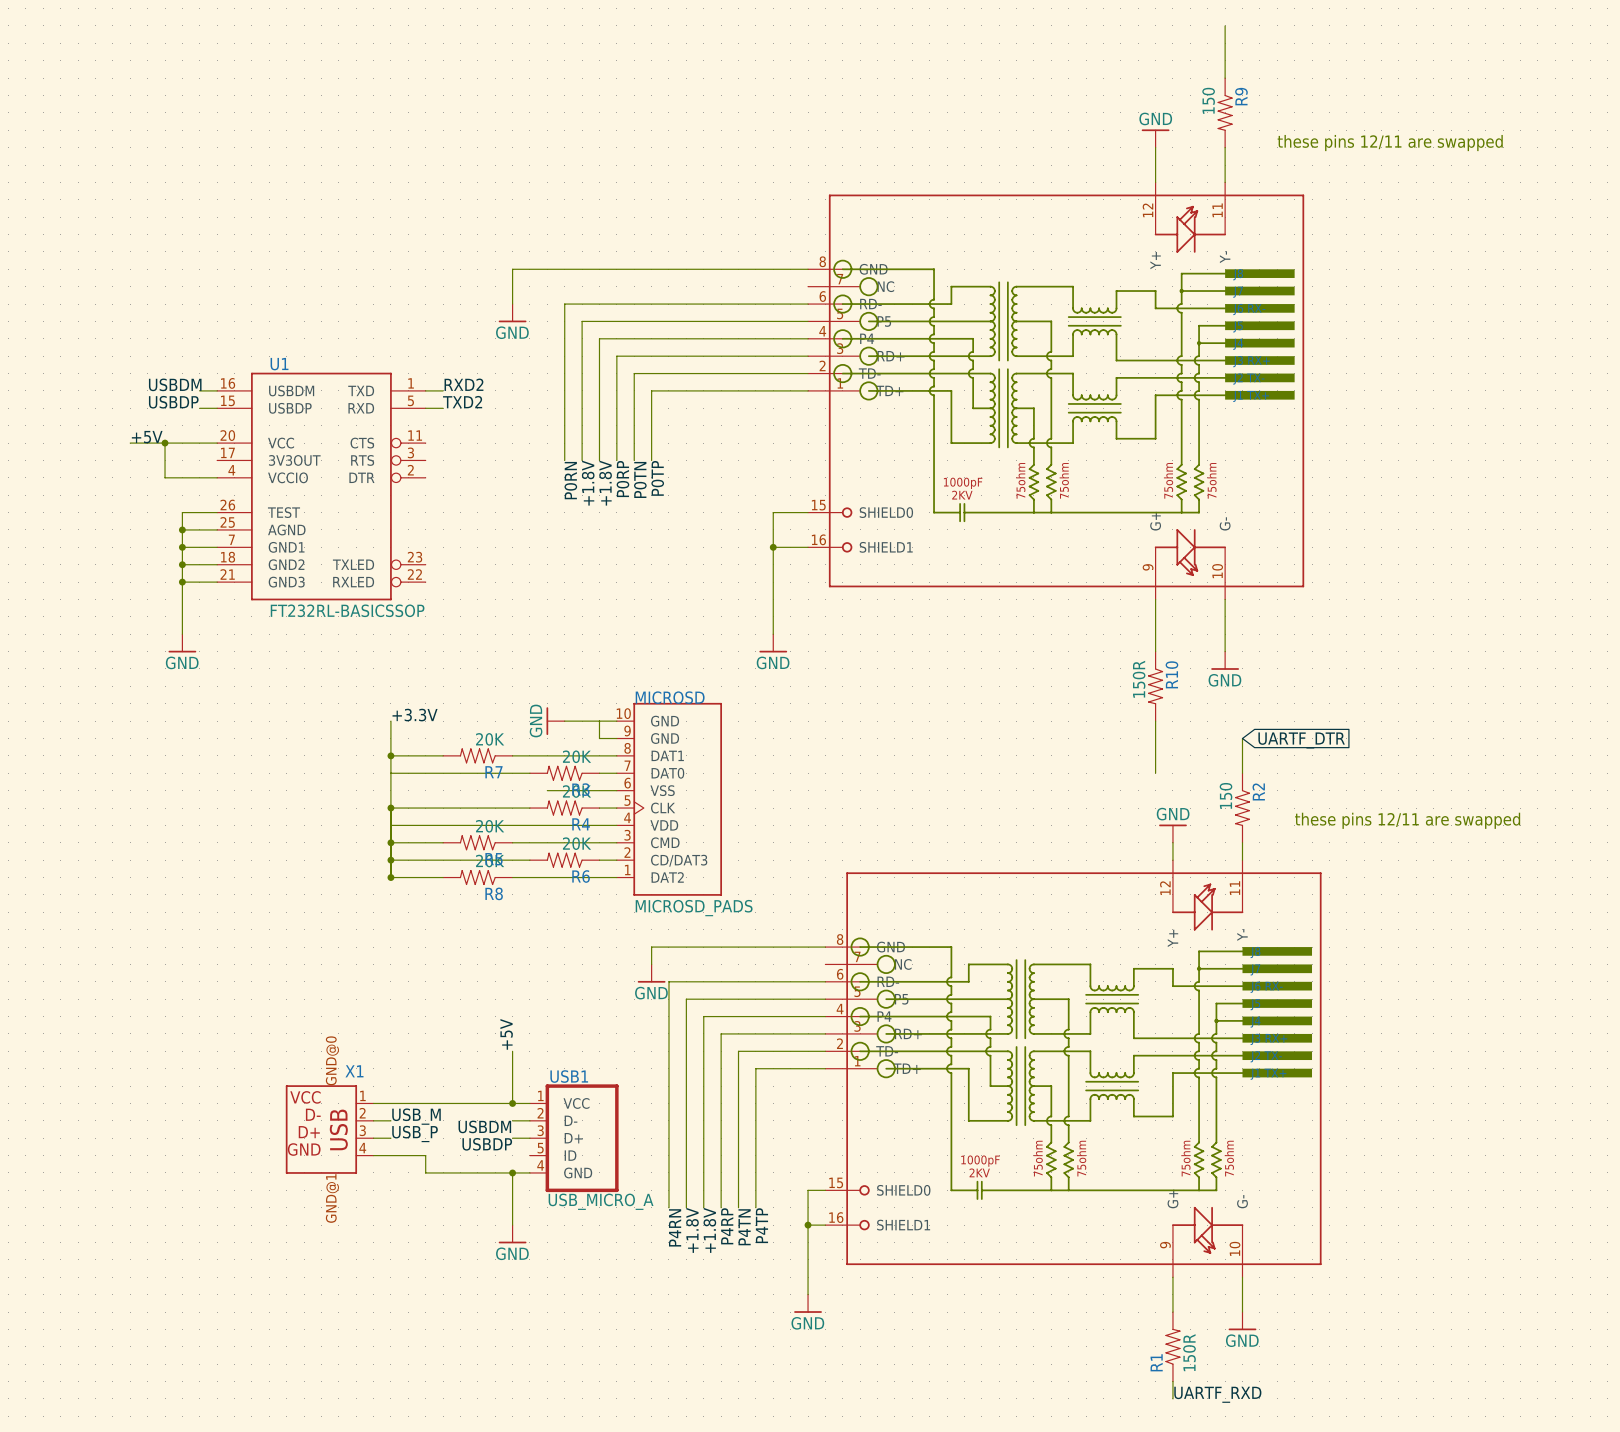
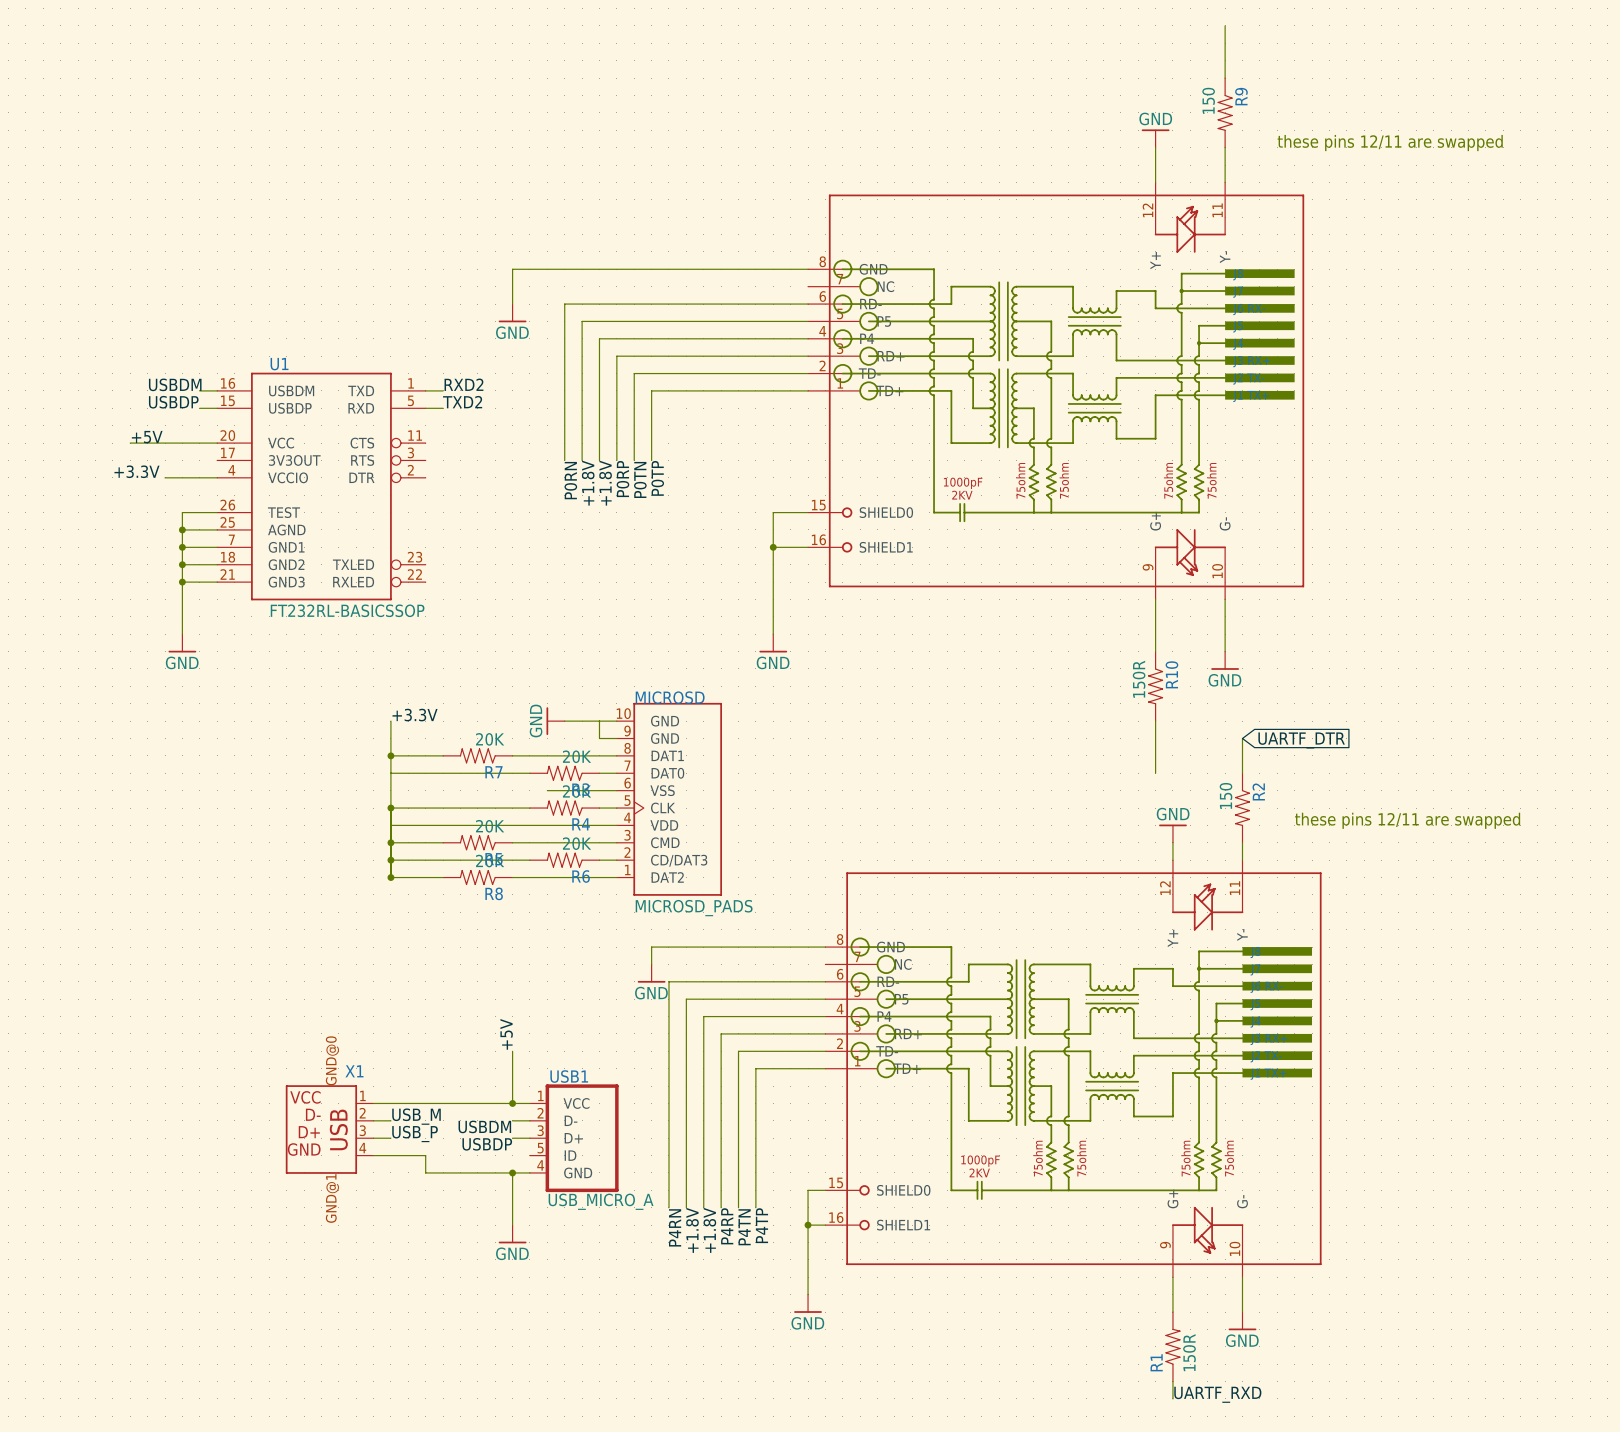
wire: (165, 443) (165, 477) -> none
junction: (165, 443) -> none
label: none -> +3.3V (136, 471)

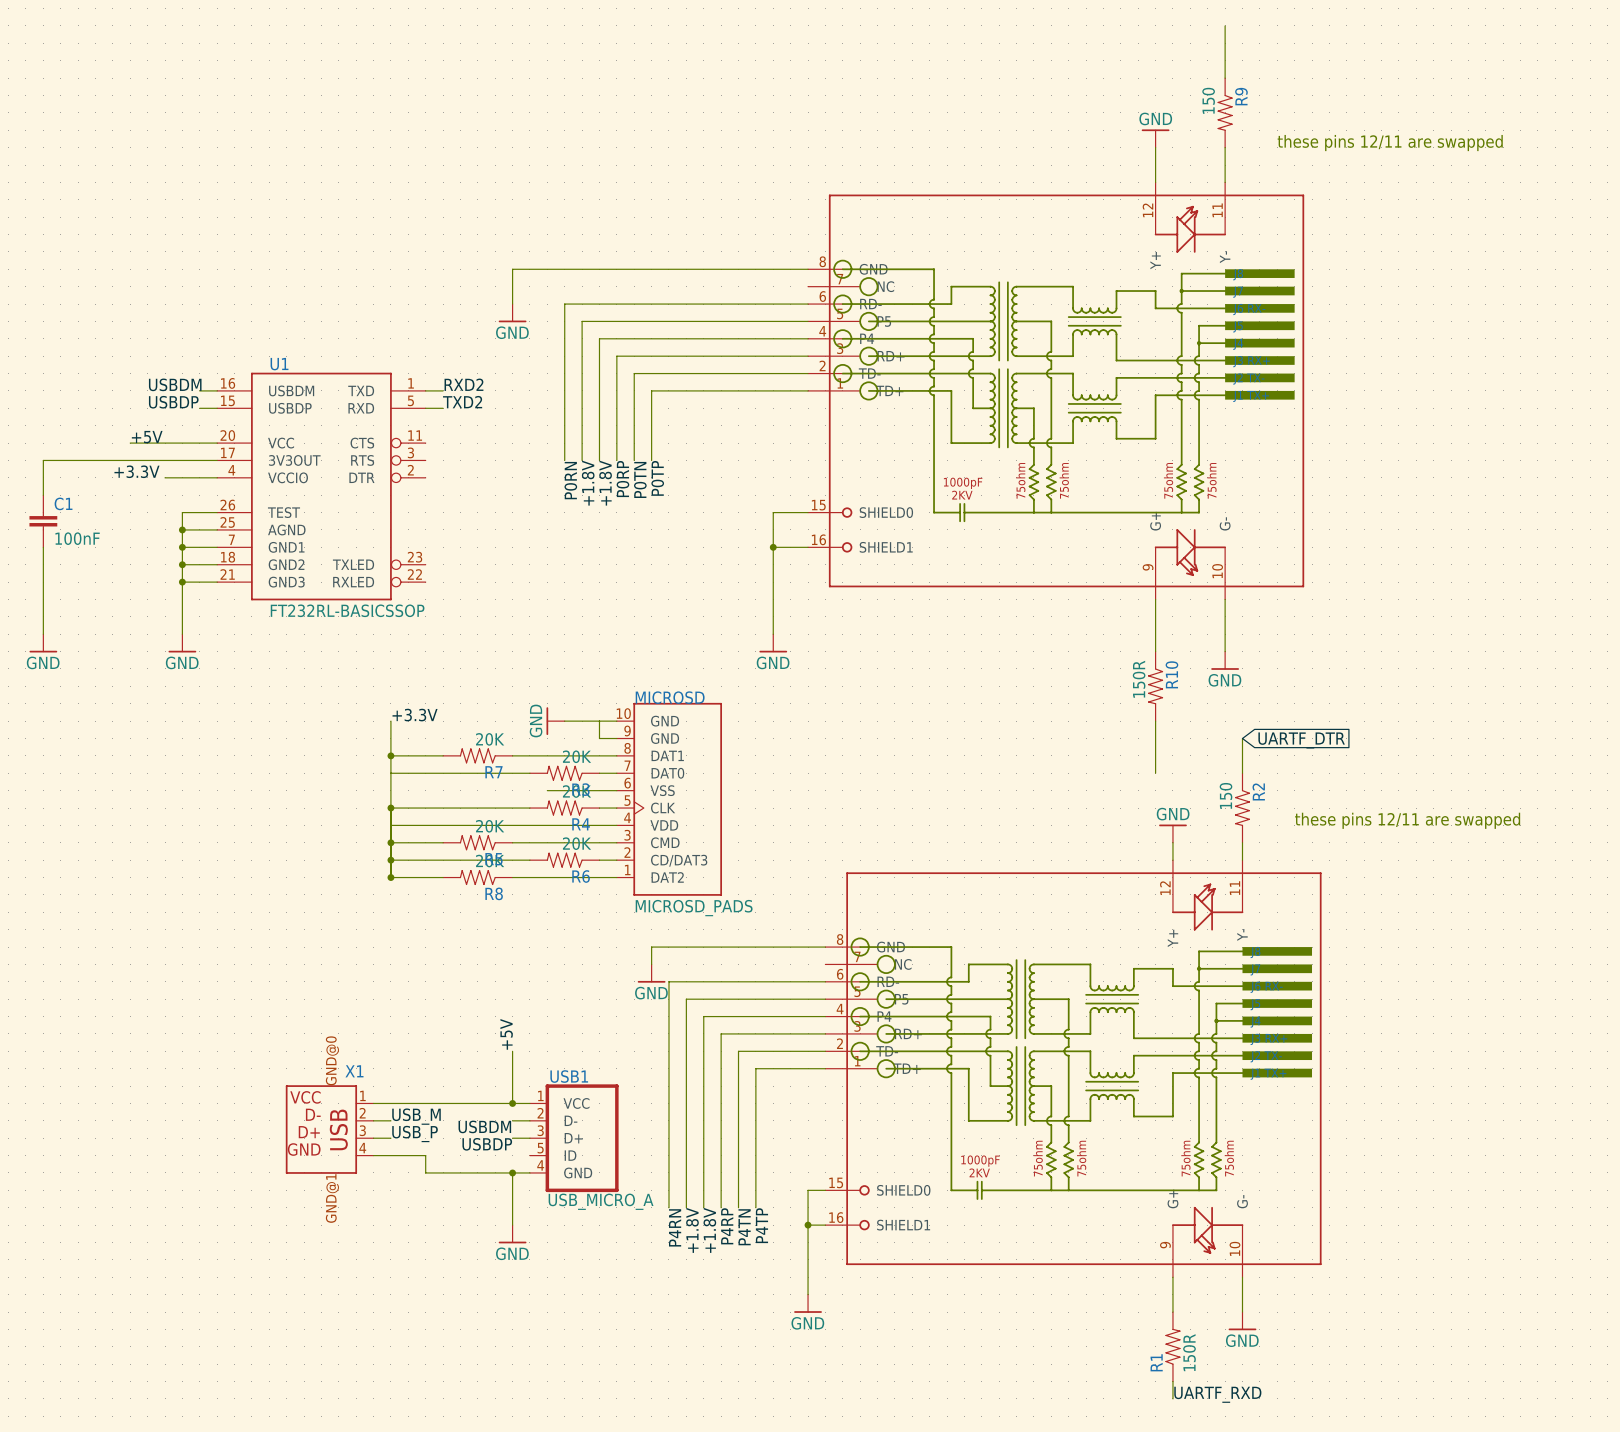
wire: none -> (217, 460) (43, 460) (43, 495)
C1: none -> 100nF (43, 521)
wire: none -> (43, 547) (43, 634)
power symbol: none -> GND (43, 643)

